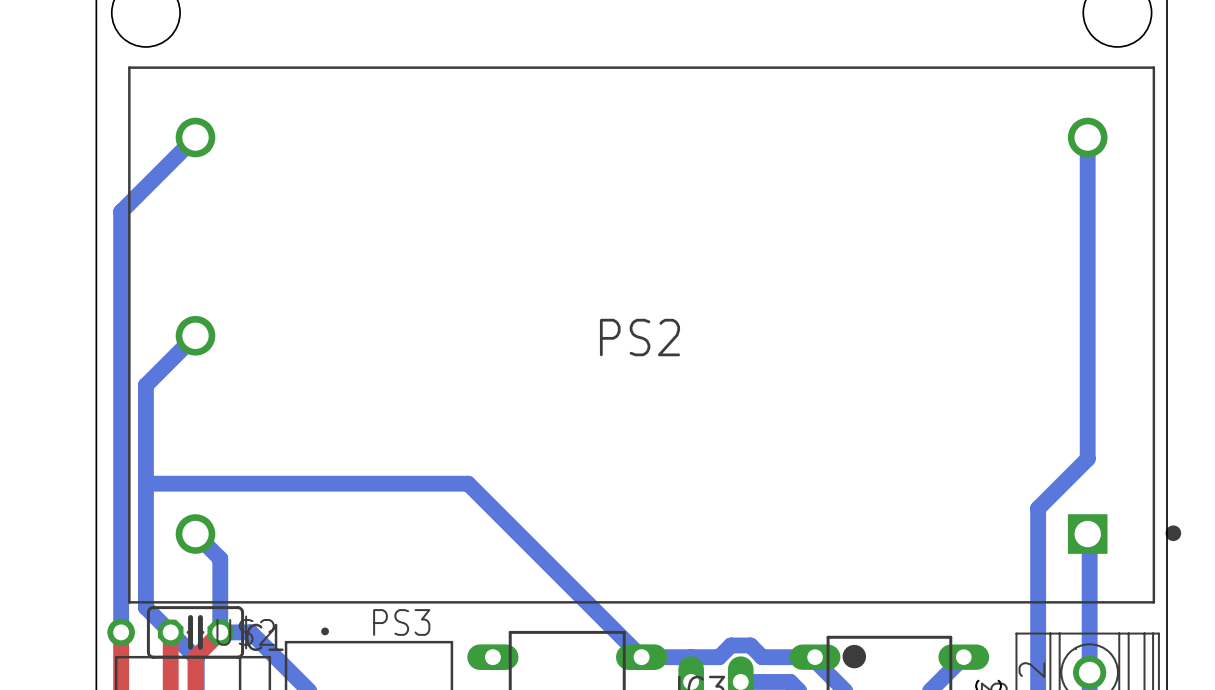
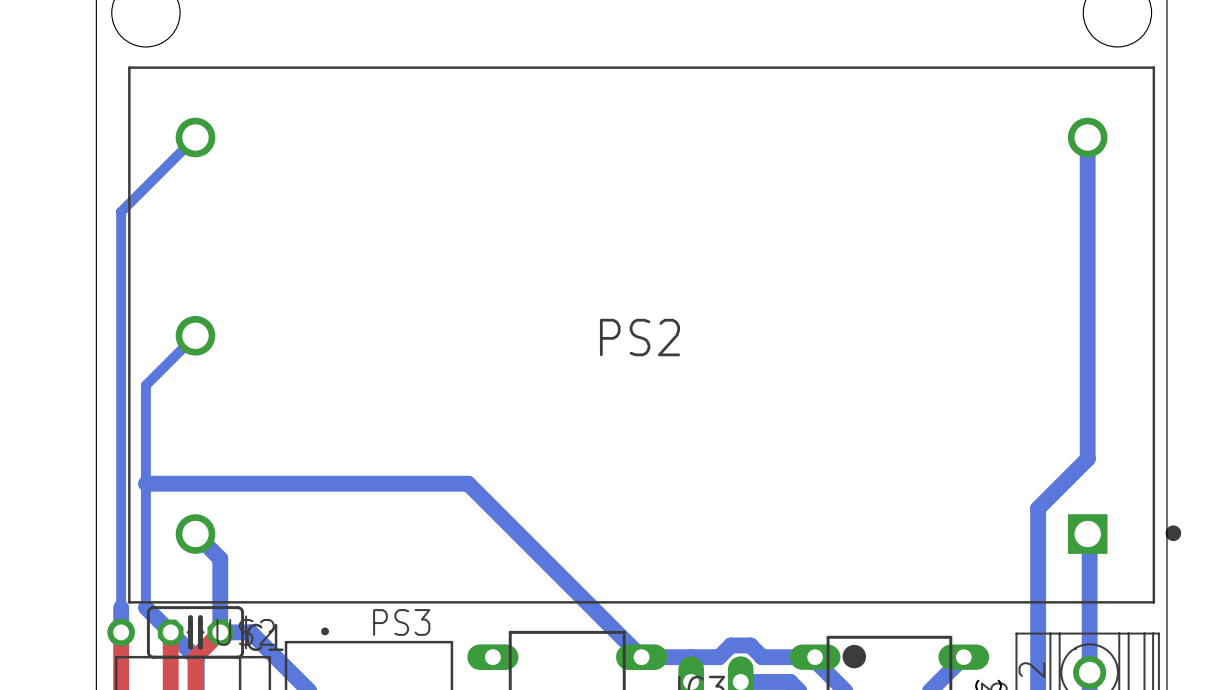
bottom track width: thick (195, 137) (121, 211) (121, 607) -> thin (195, 137) (121, 211) (121, 607)
bottom track width: thick (195, 335) (145, 385) (145, 607) -> thin (195, 335) (145, 385) (145, 607)

